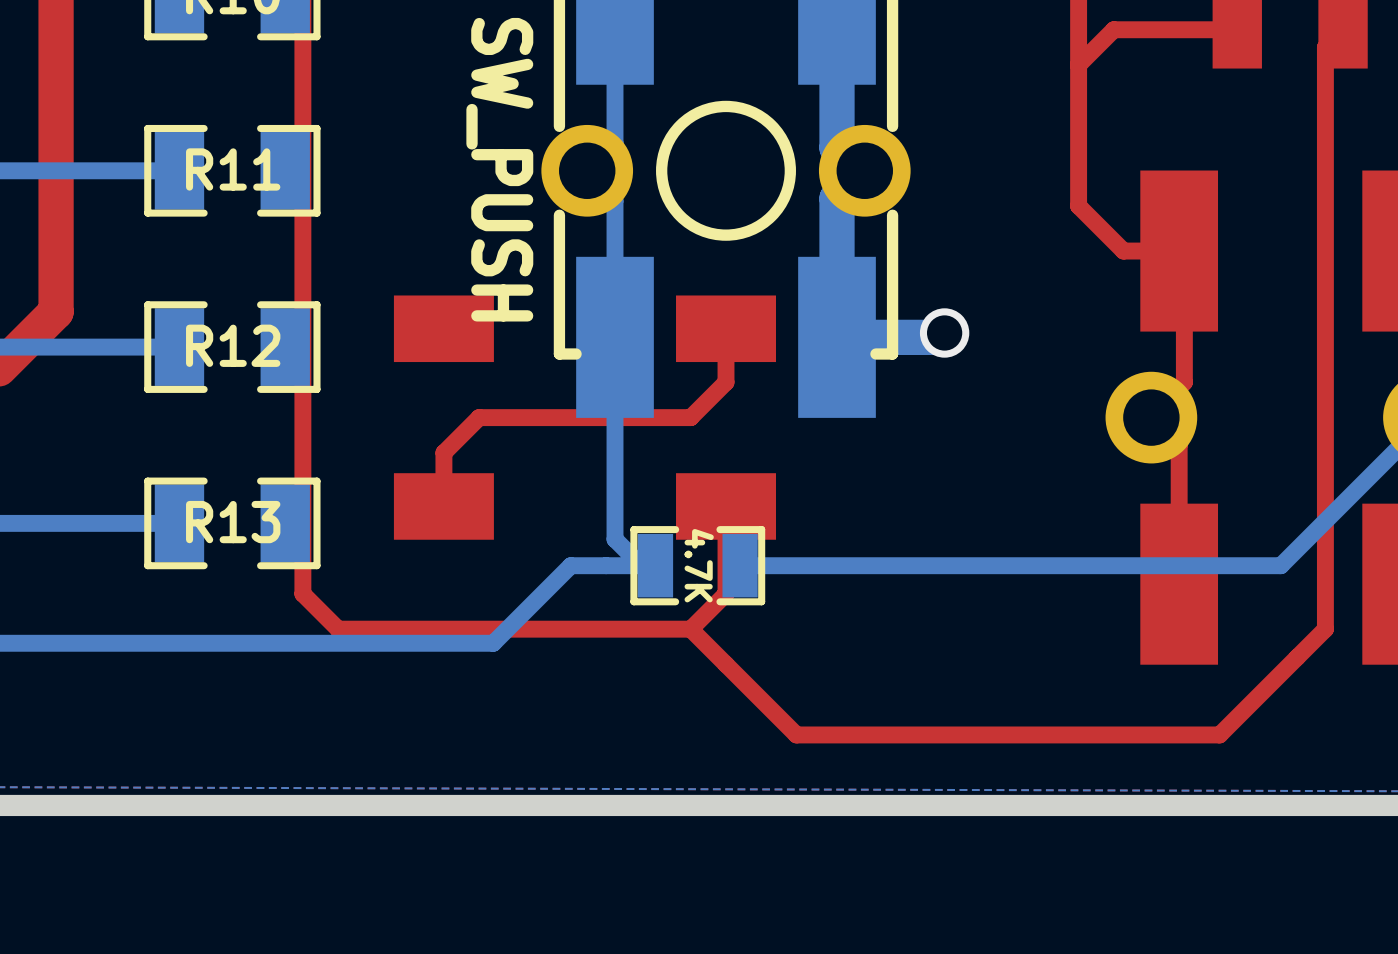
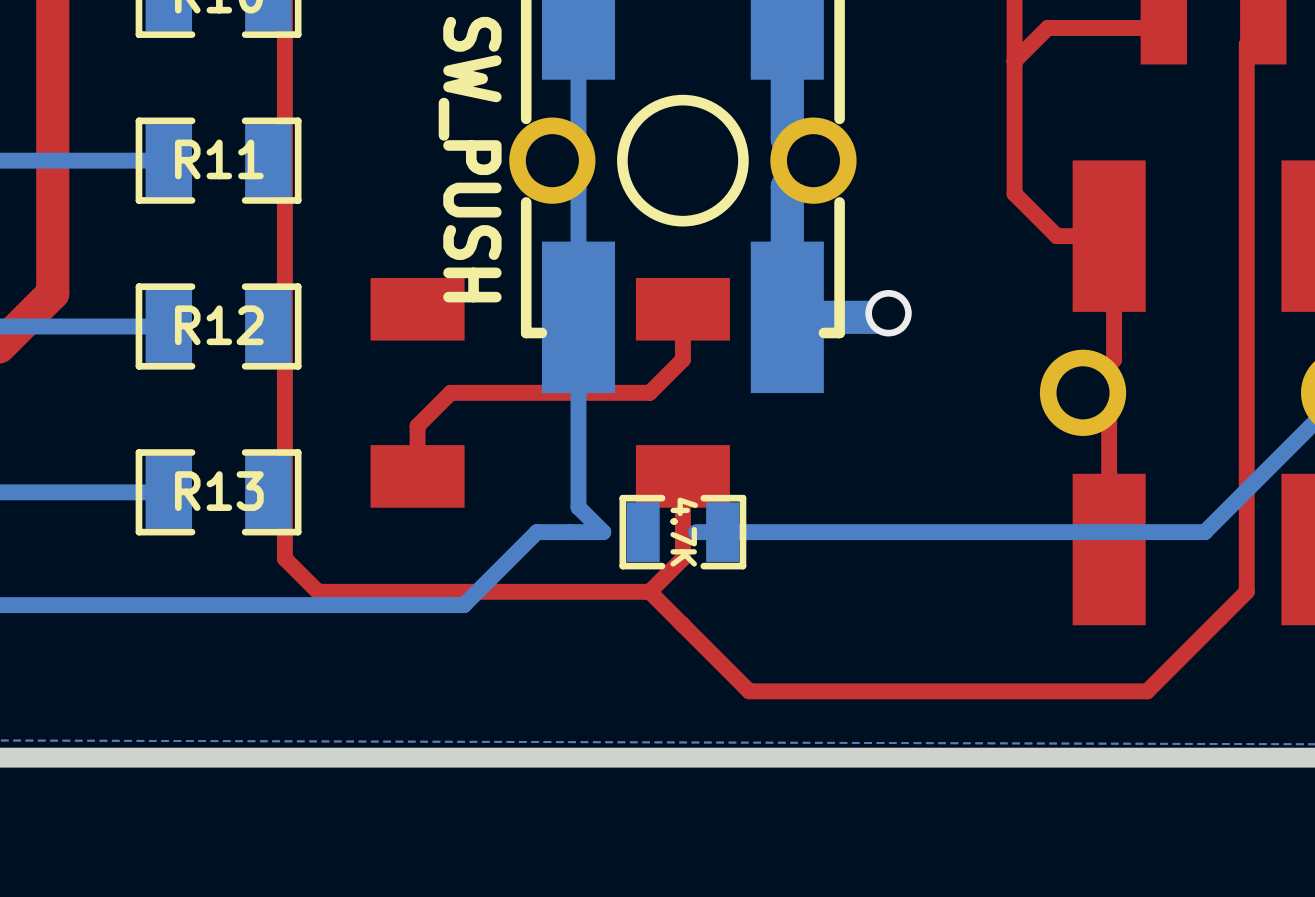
part position: (697, 565) -> (682, 532)

